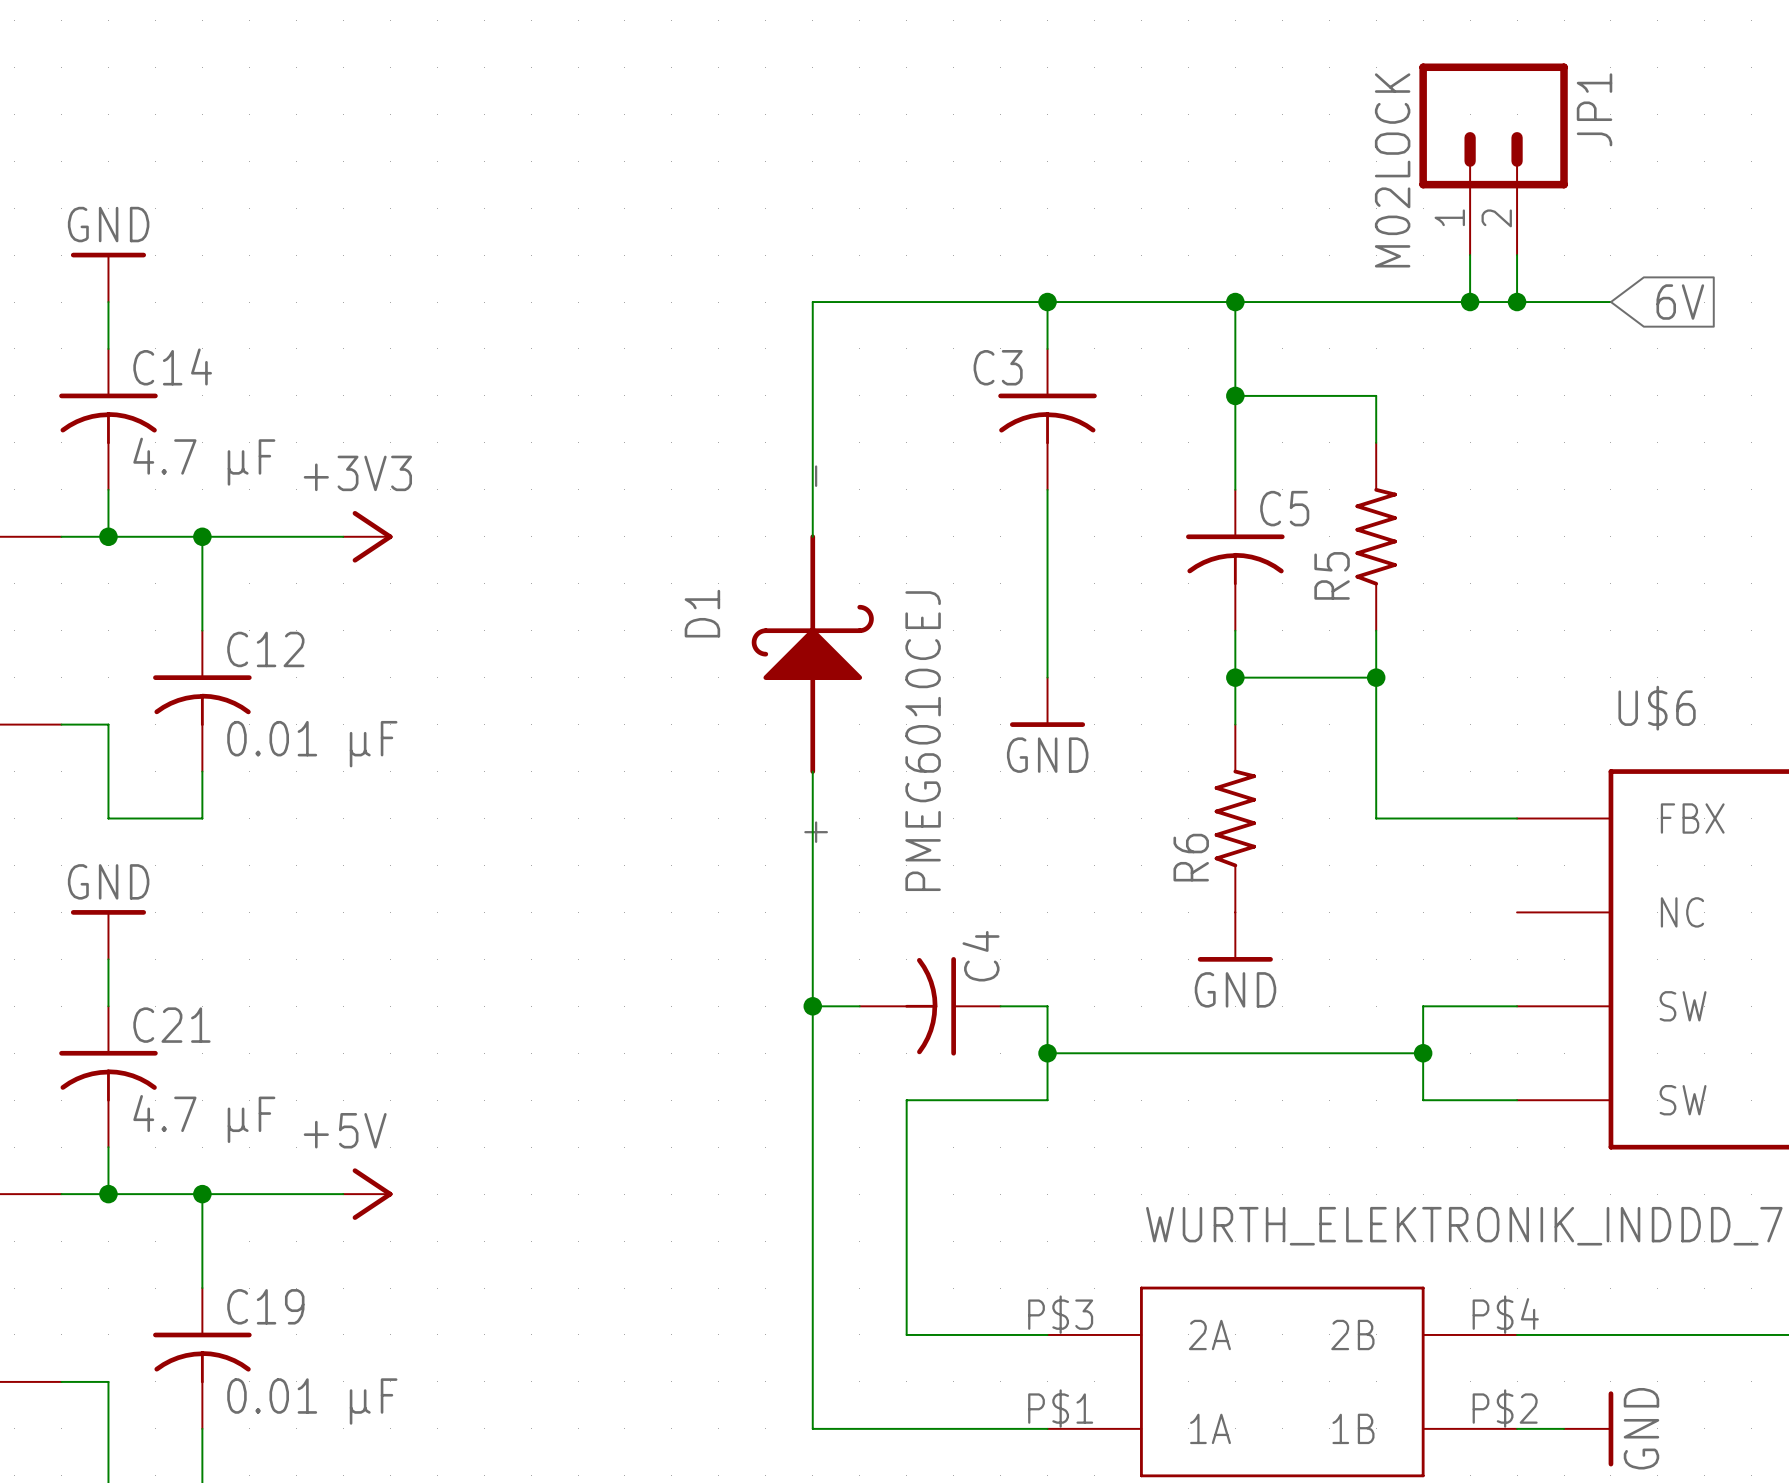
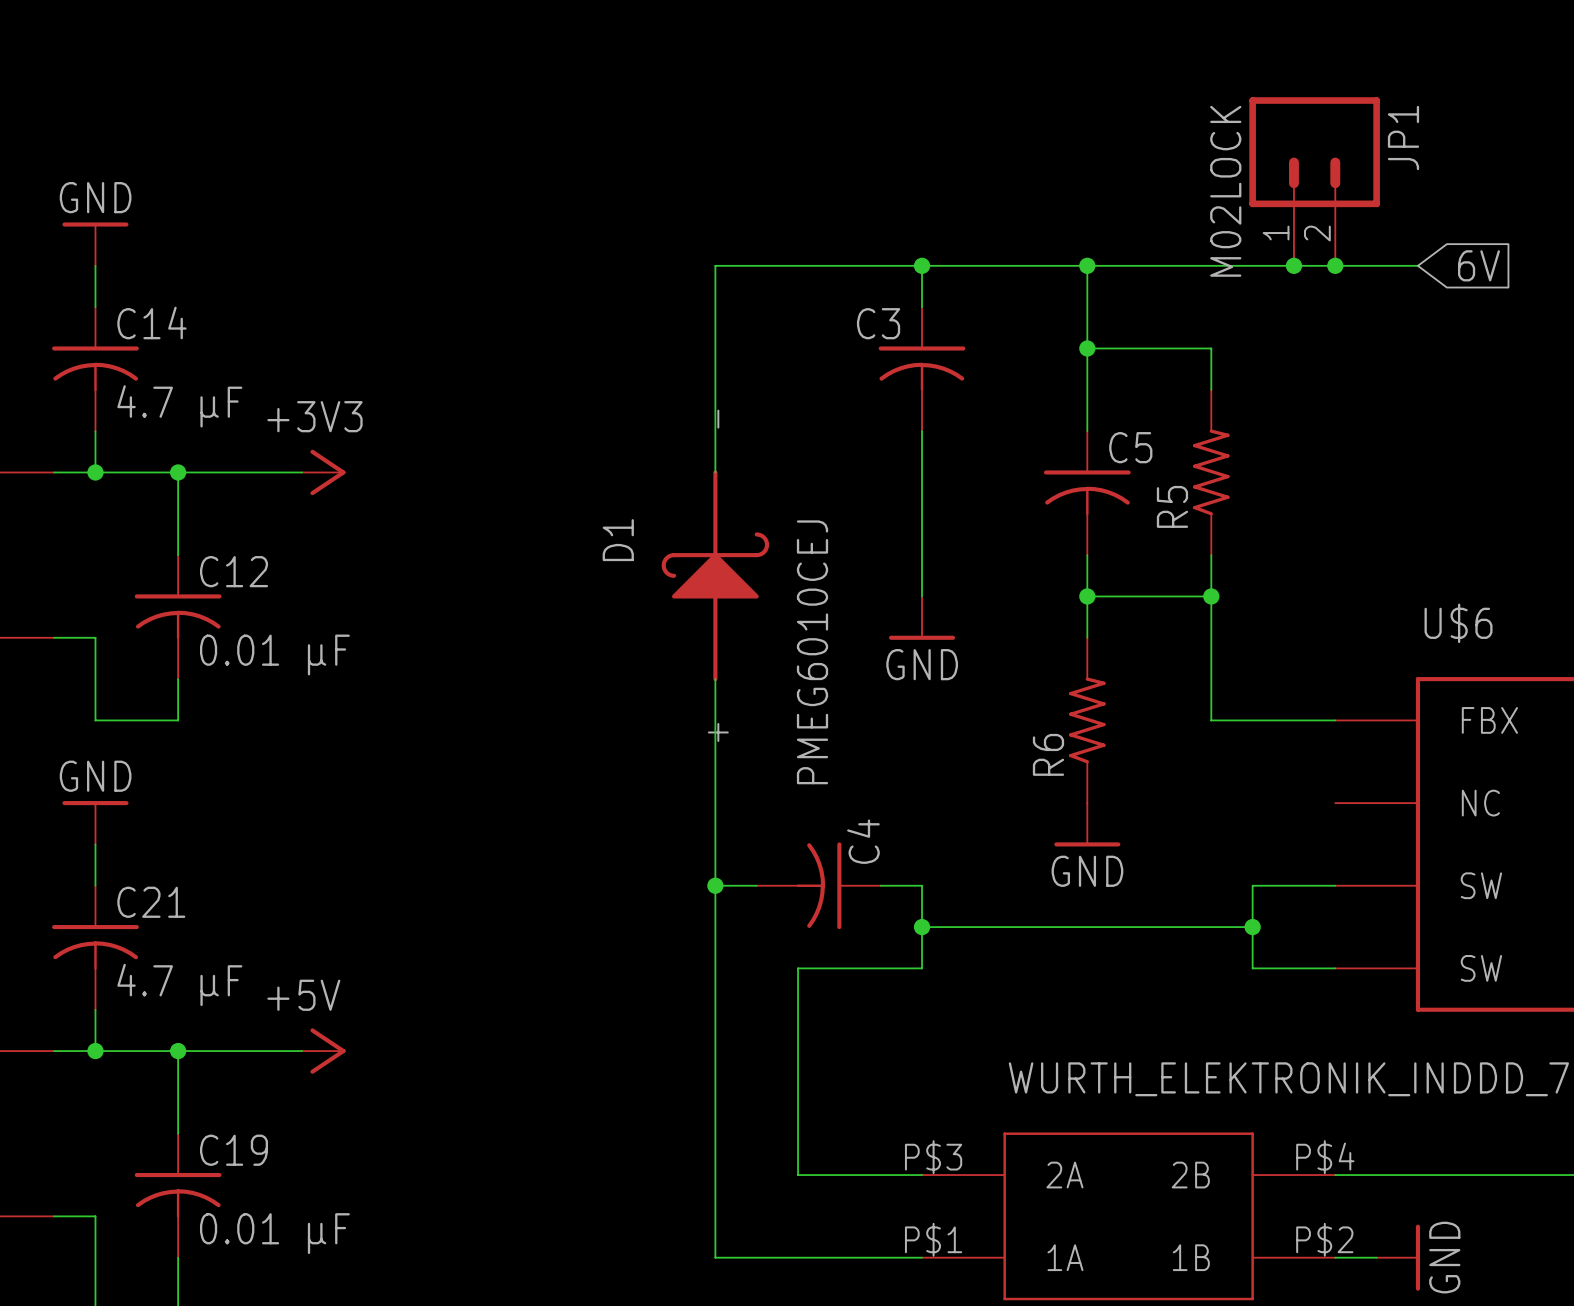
JP1 position: (1493, 159) -> (1314, 181)

